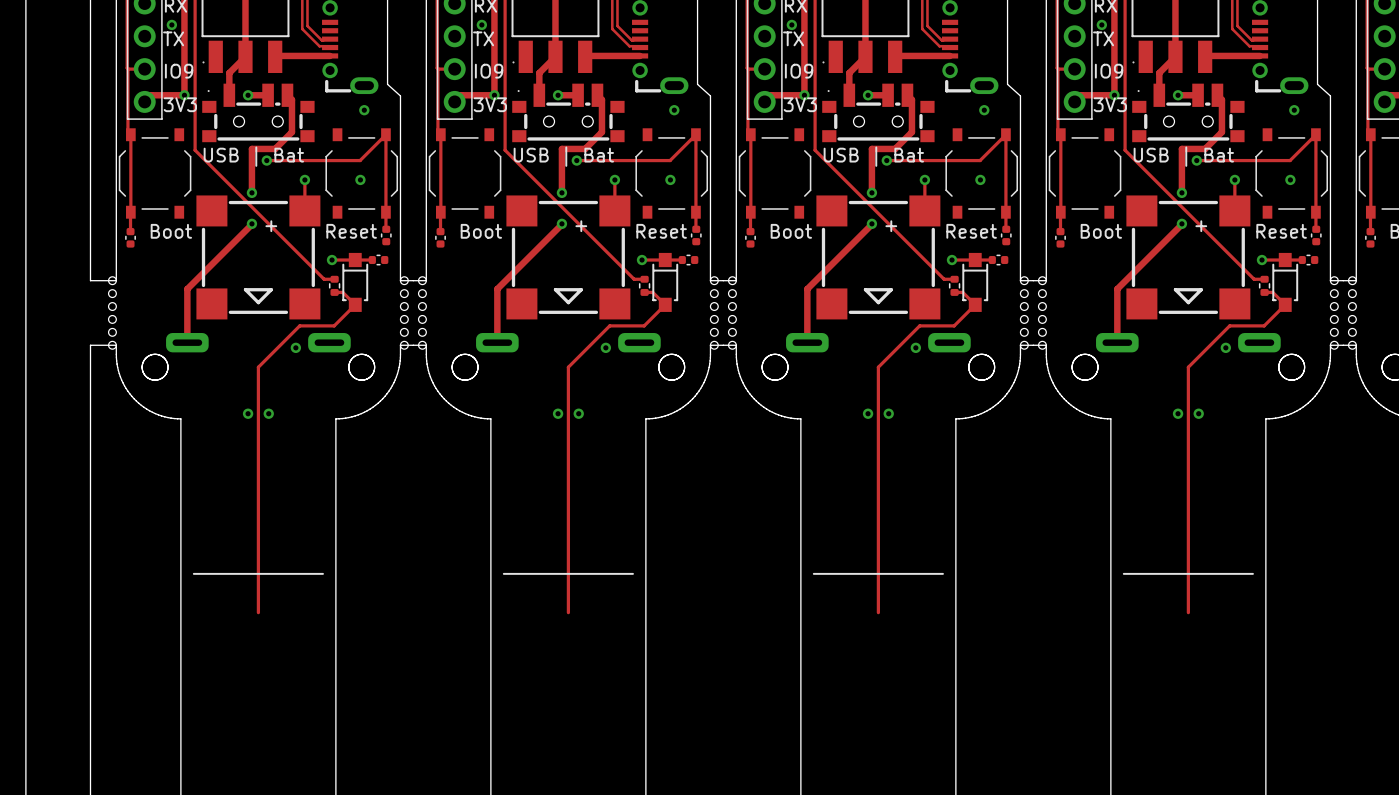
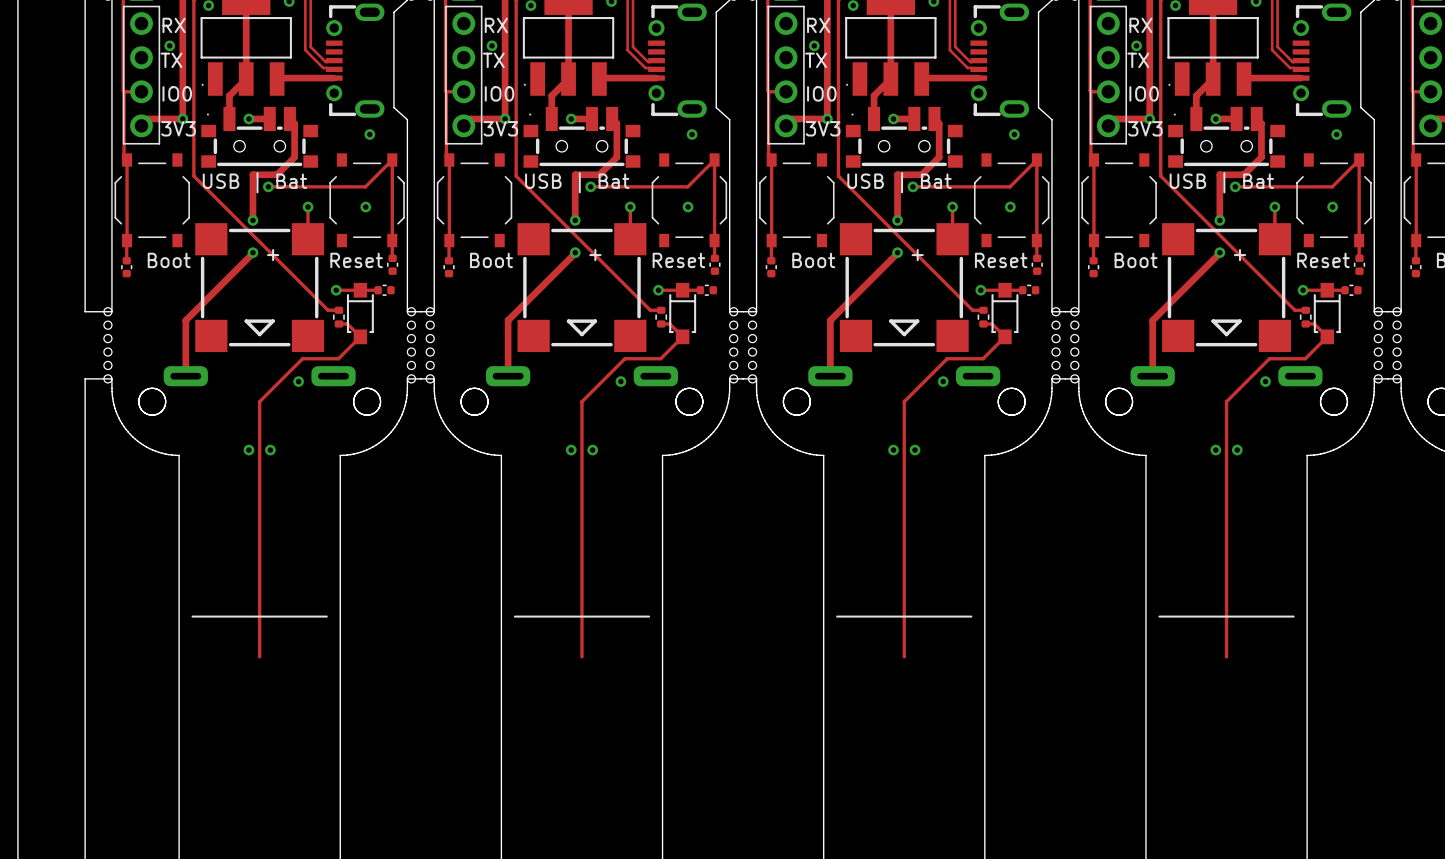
text: IO9 (179, 71) -> IO0 (177, 93)
text: IO9 (489, 71) -> IO0 (499, 93)
text: IO9 (799, 71) -> IO0 (821, 93)
text: IO9 (1109, 71) -> IO0 (1144, 93)

